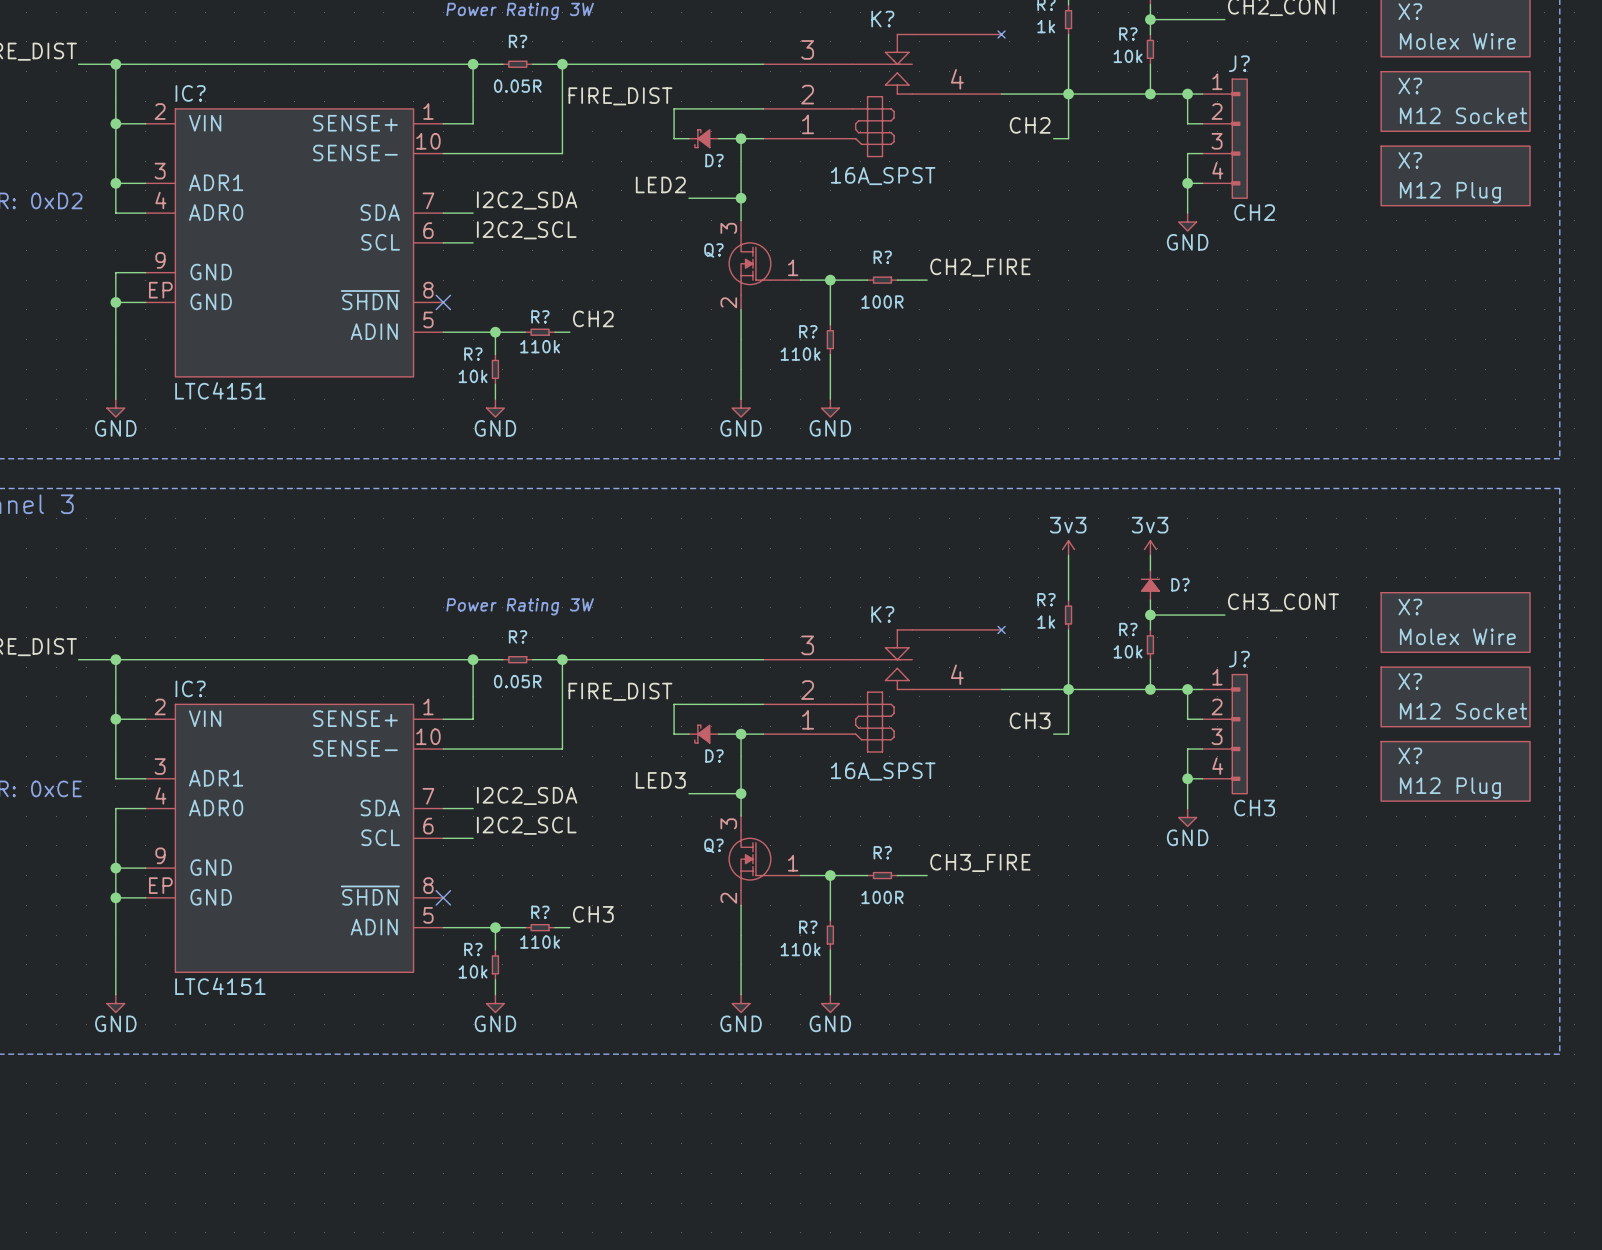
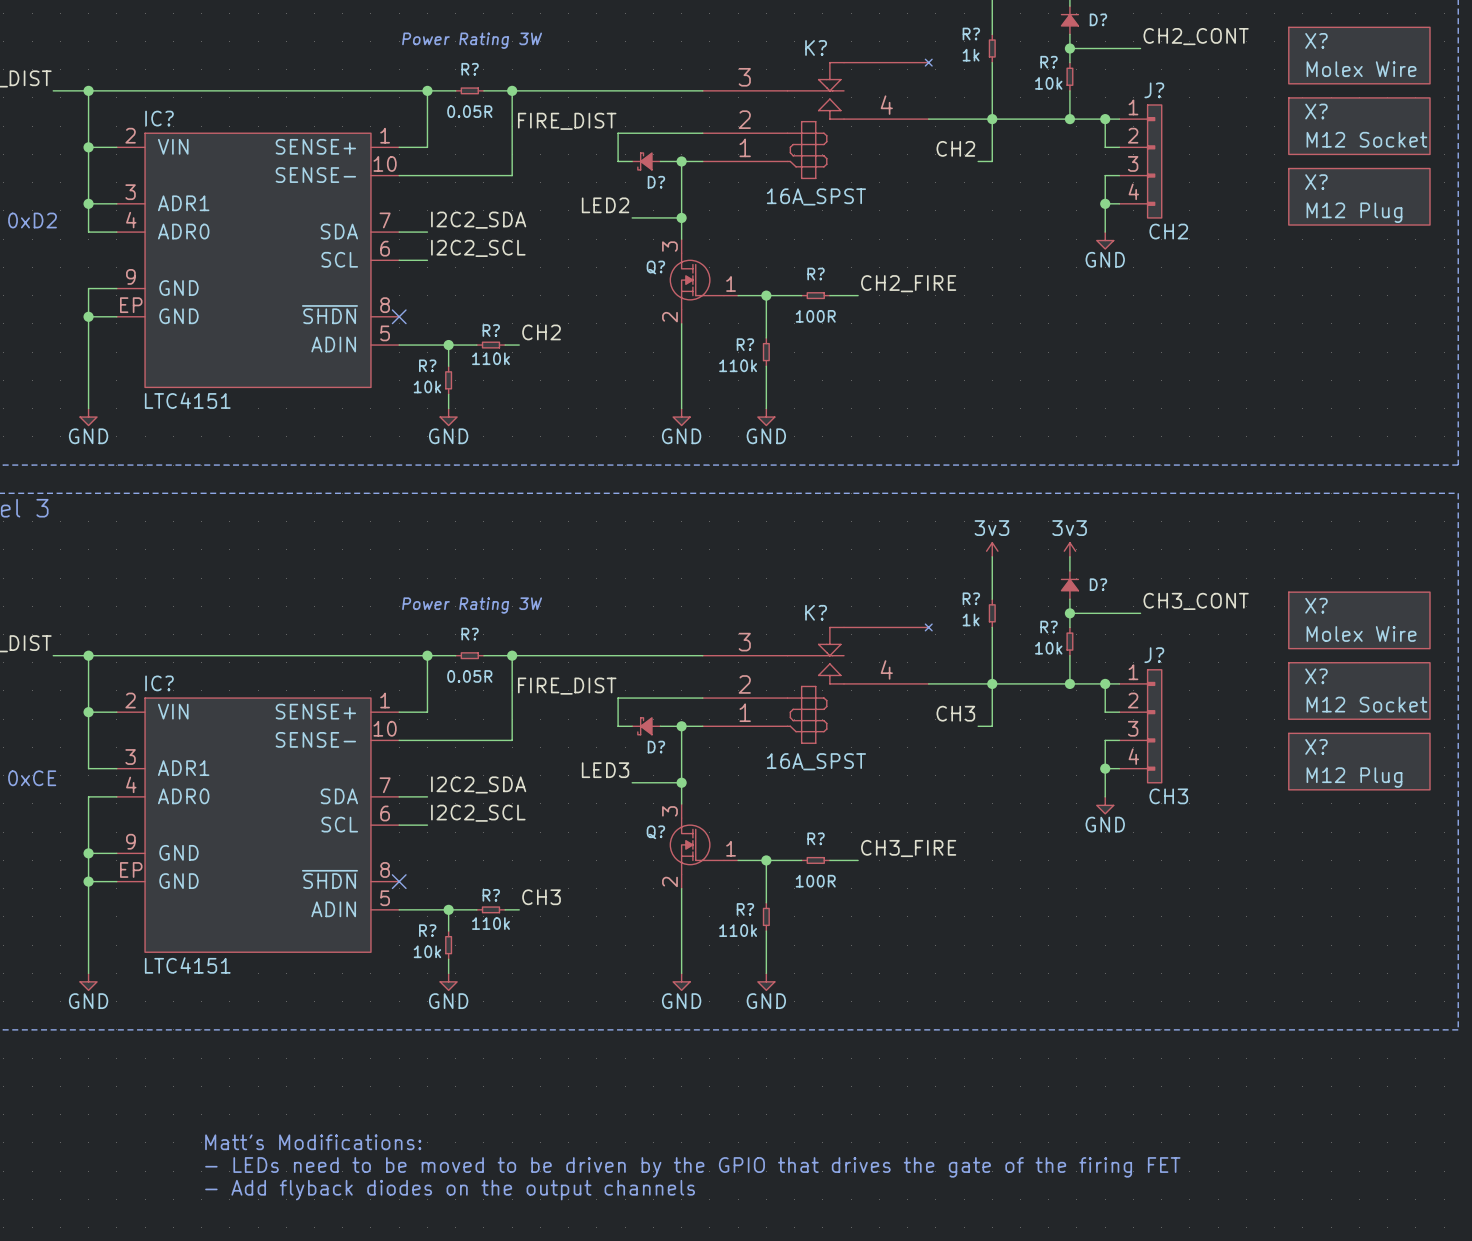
text: none -> Matt's Modifications: (313, 1142)
text: none -> - LEDs need to be moved to be driven by the GPIO that drives the gate of the firing FET (692, 1167)
text: none -> - Add flyback diodes on the output channels (450, 1190)

